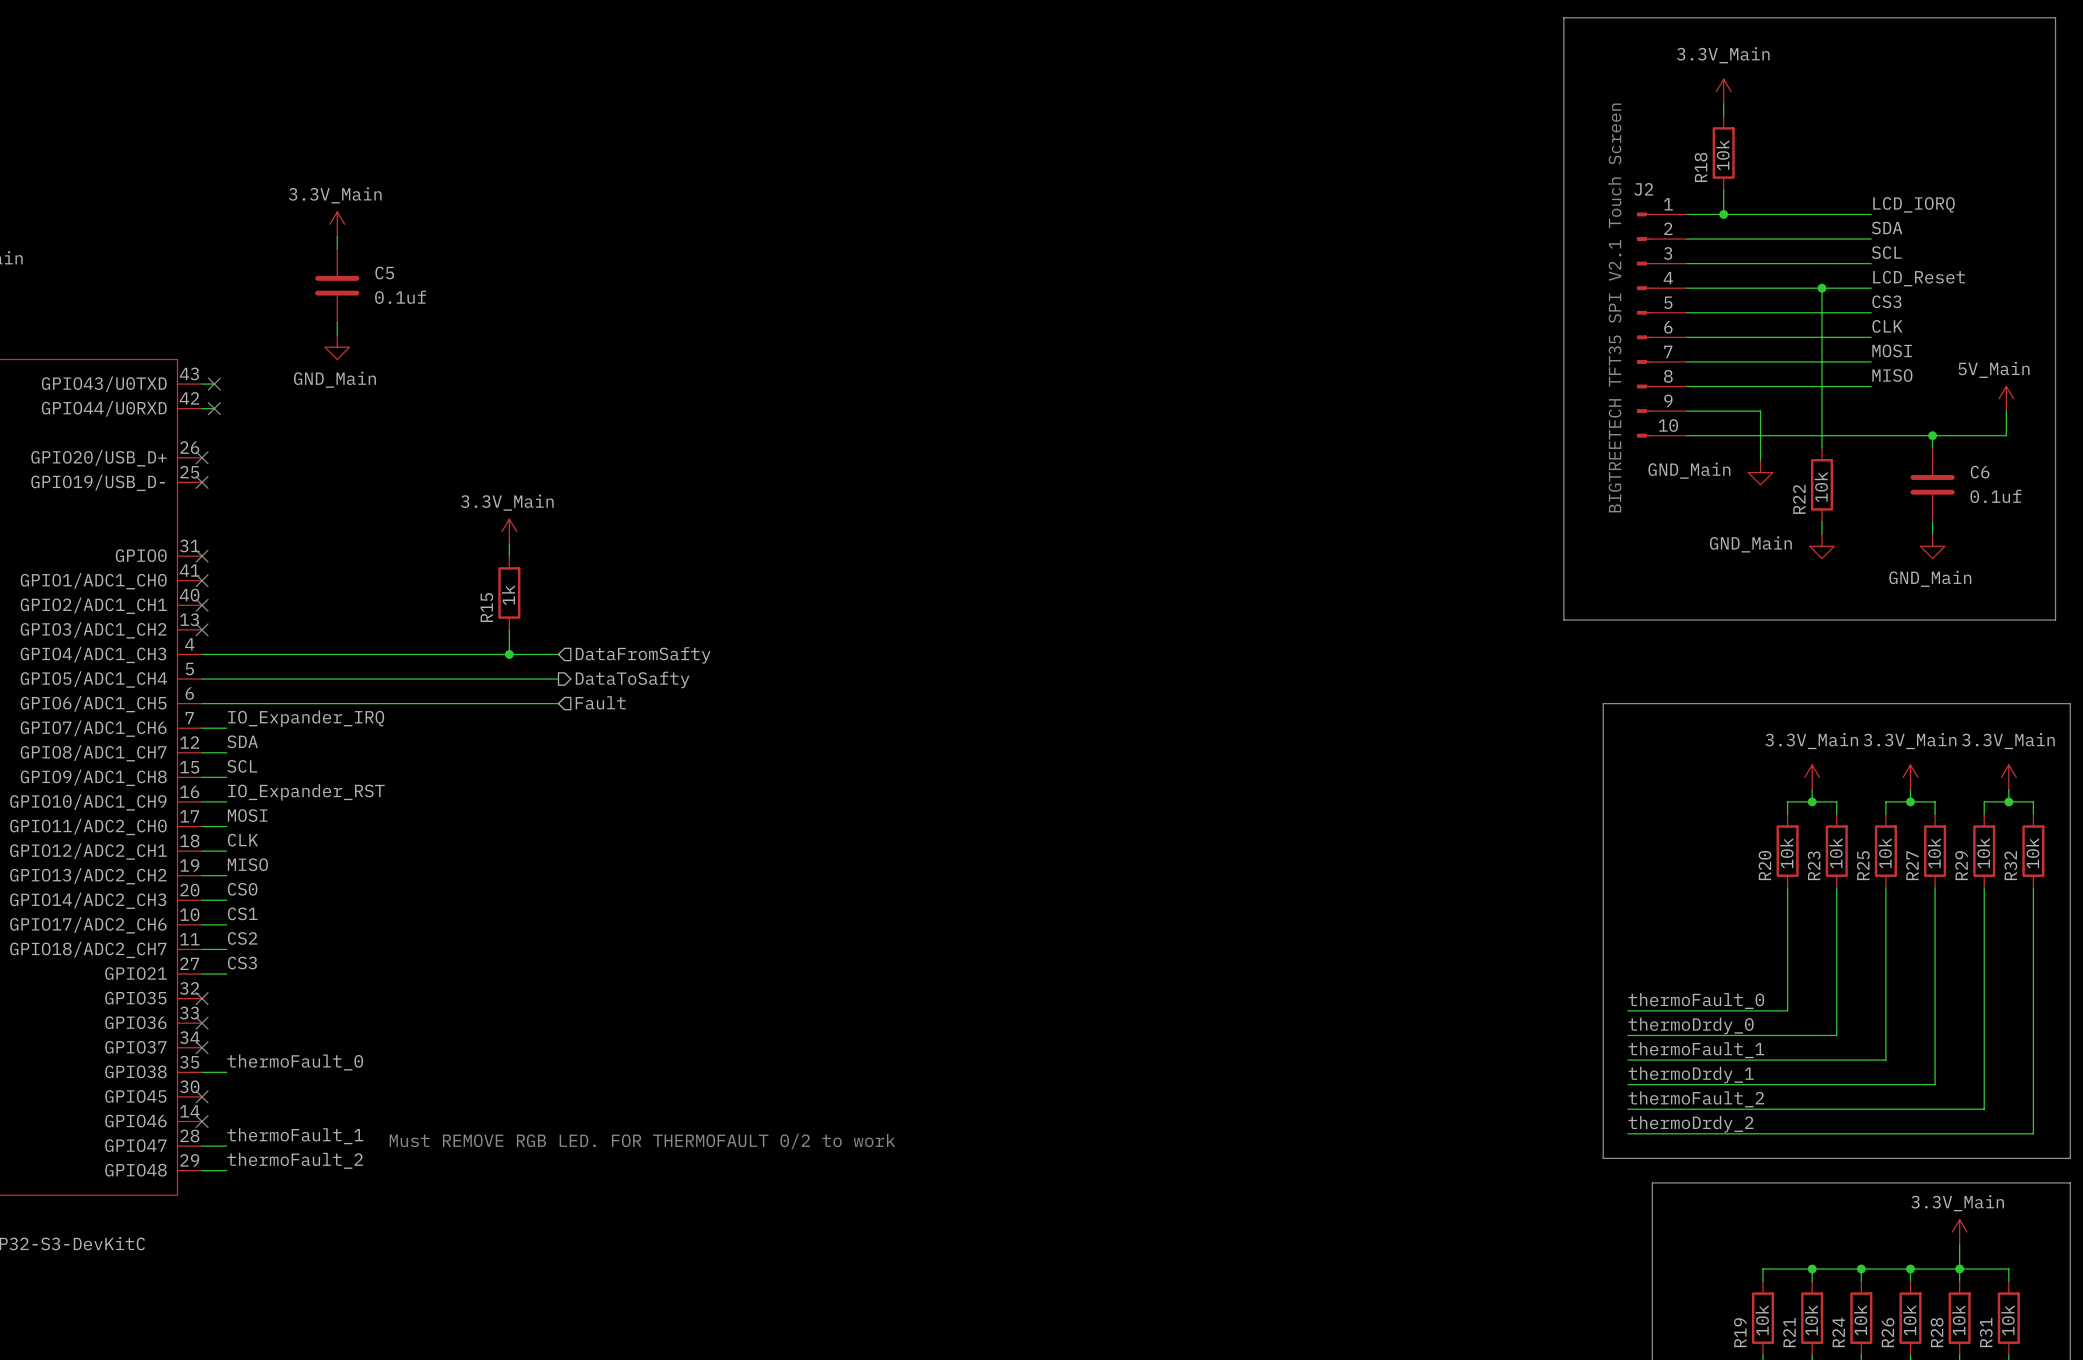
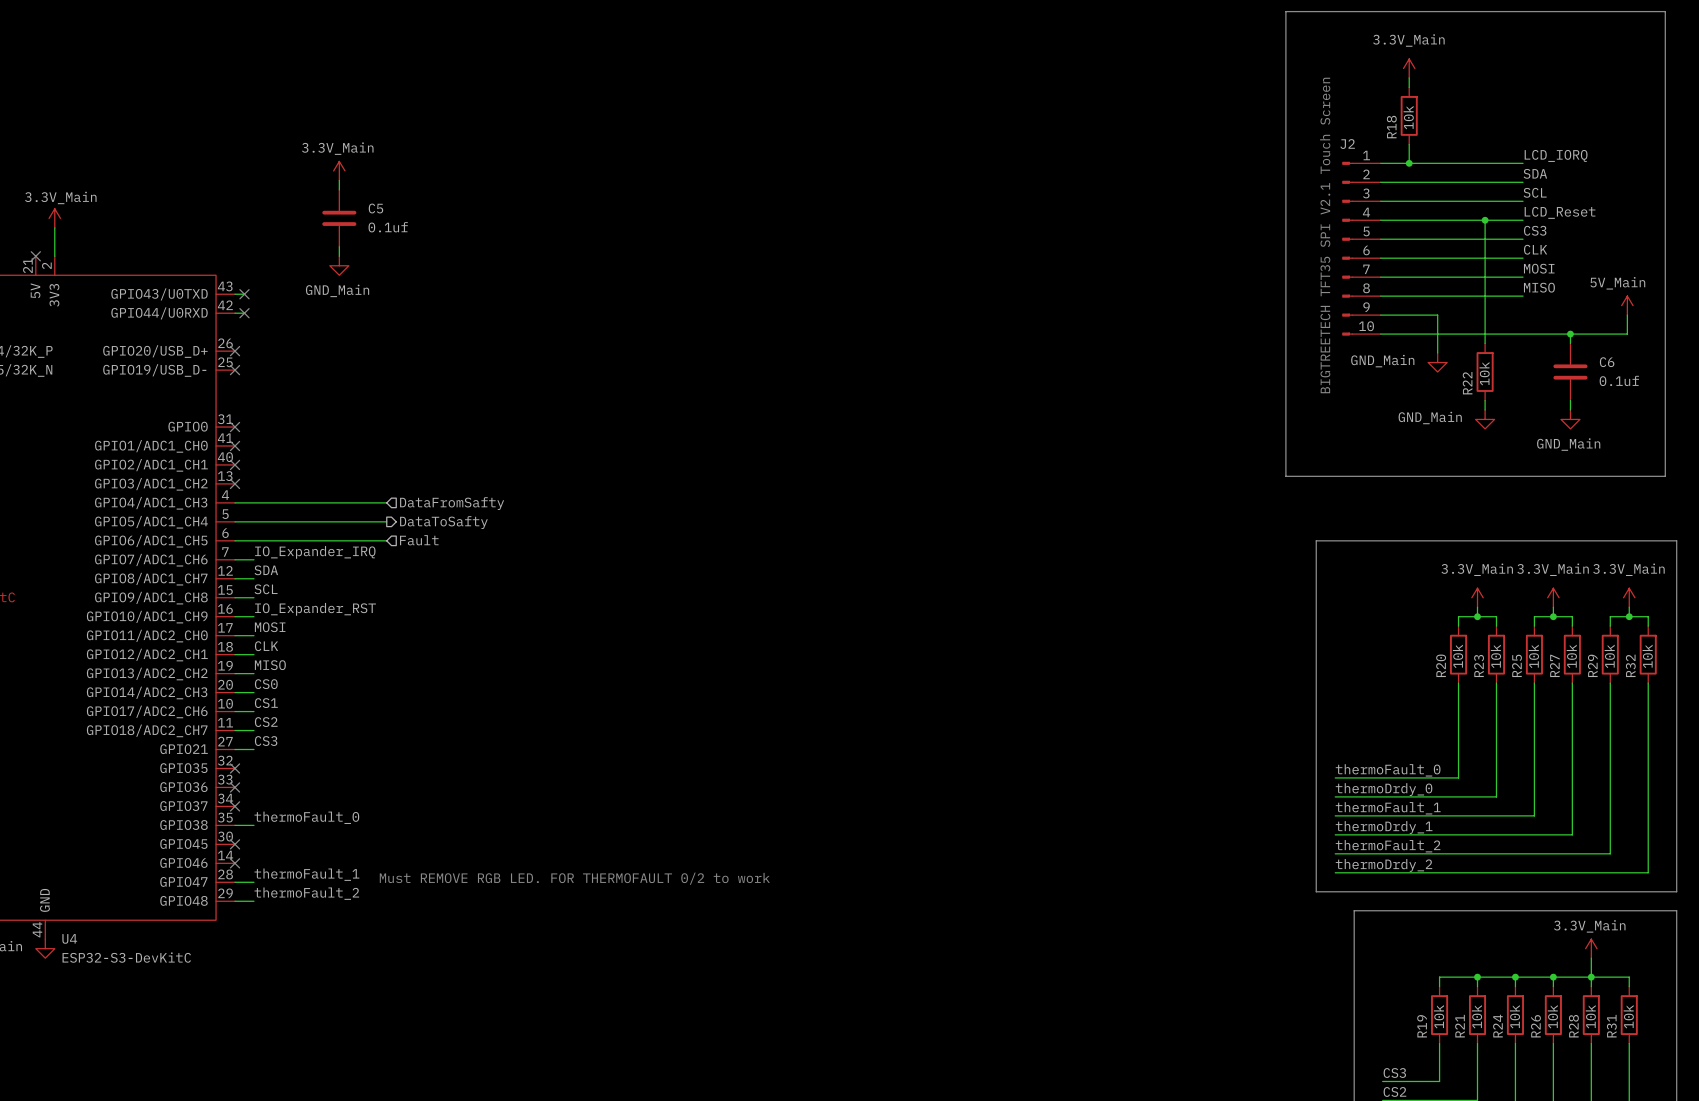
power symbol: 3.3V_Main (509, 531) -> none
wire: (509, 543) (509, 556) -> none
R15: 1k (509, 593) -> none
wire: (509, 629) (509, 654) -> none
wire: (398, 654) (558, 654) -> none
junction: (509, 654) -> none
hierarchical label position: DataFromSafty (643, 655) -> DataFromSafty (452, 503)
wire: (398, 679) (558, 679) -> none
hierarchical label position: DataToSafty (632, 679) -> DataToSafty (443, 522)
hierarchical label position: Fault (600, 702) -> Fault (419, 540)
wire: (398, 703) (558, 703) -> none

